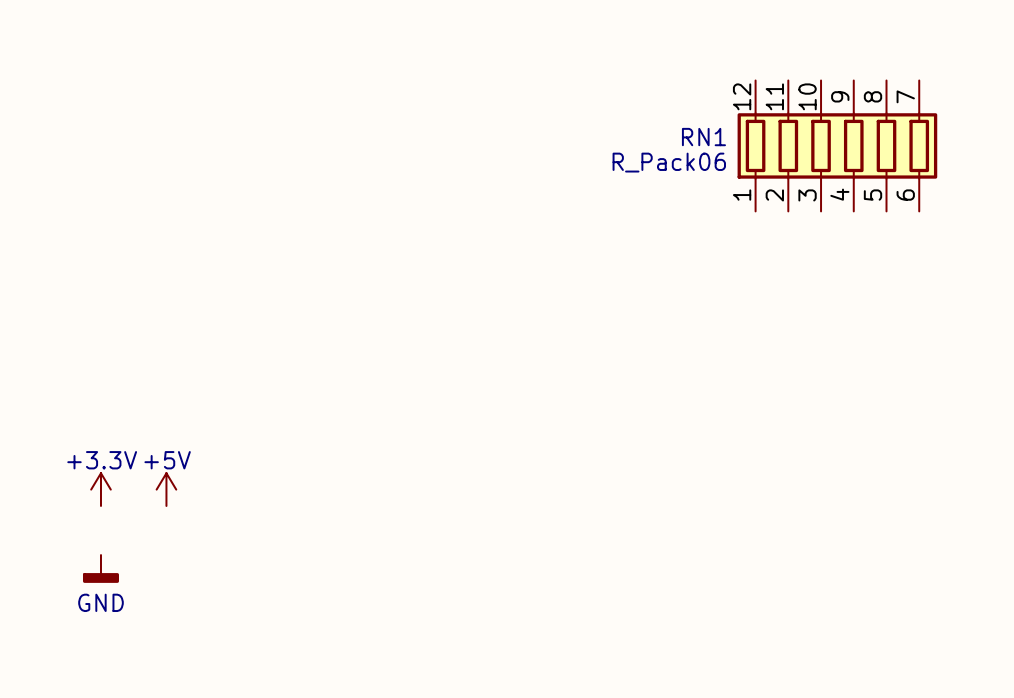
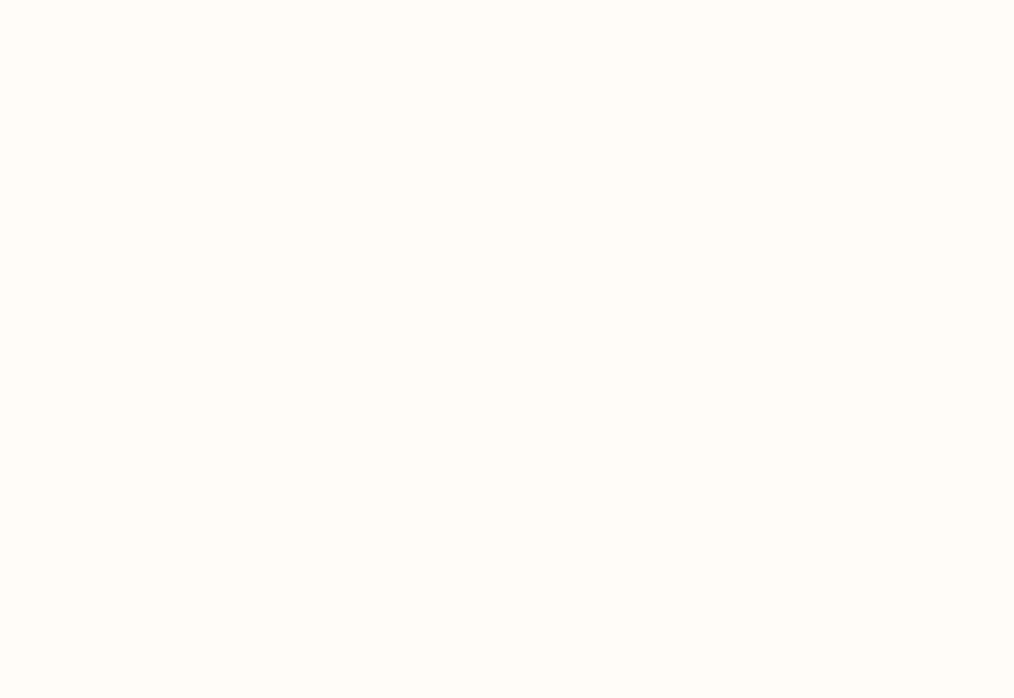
RN1: R_Pack06 (837, 145) -> none
power symbol: +3.3V (100, 489) -> none
power symbol: +5V (166, 489) -> none
power symbol: GND (100, 568) -> none

